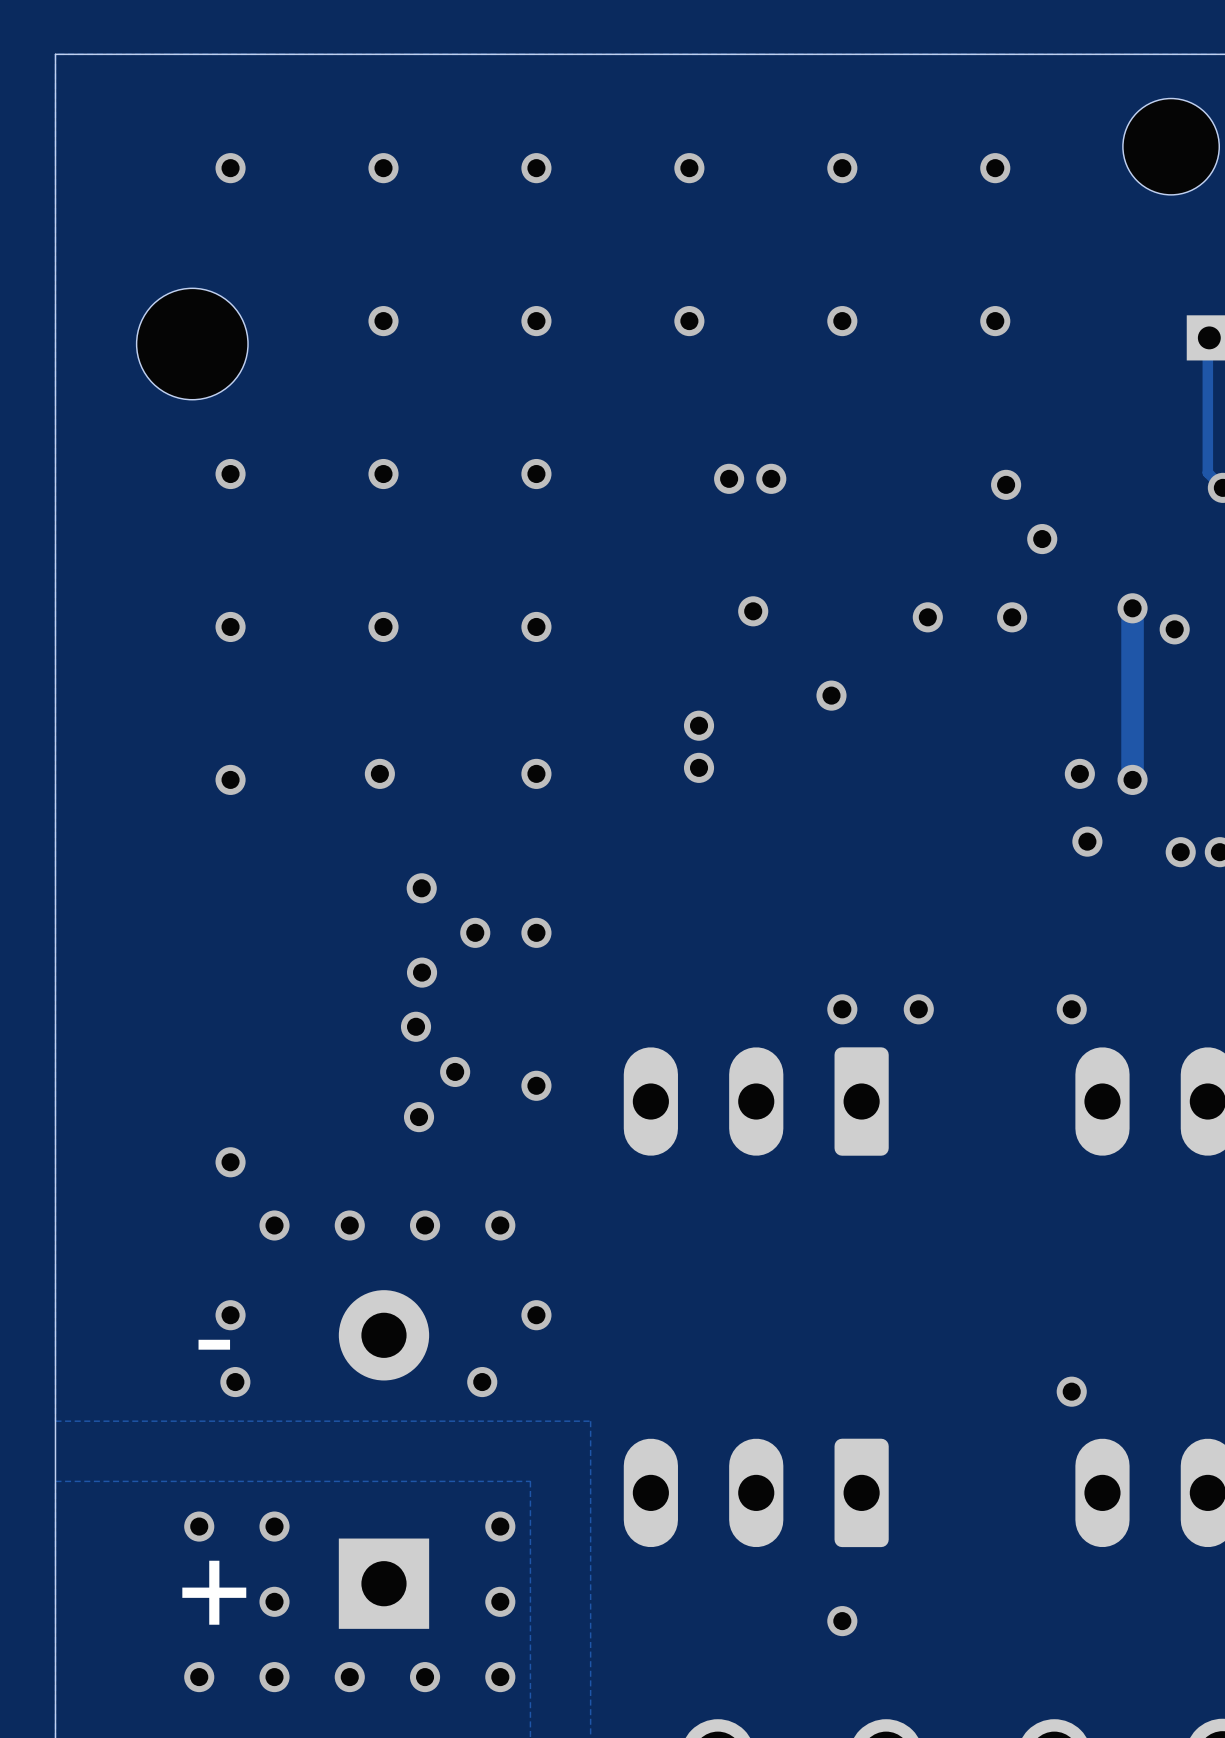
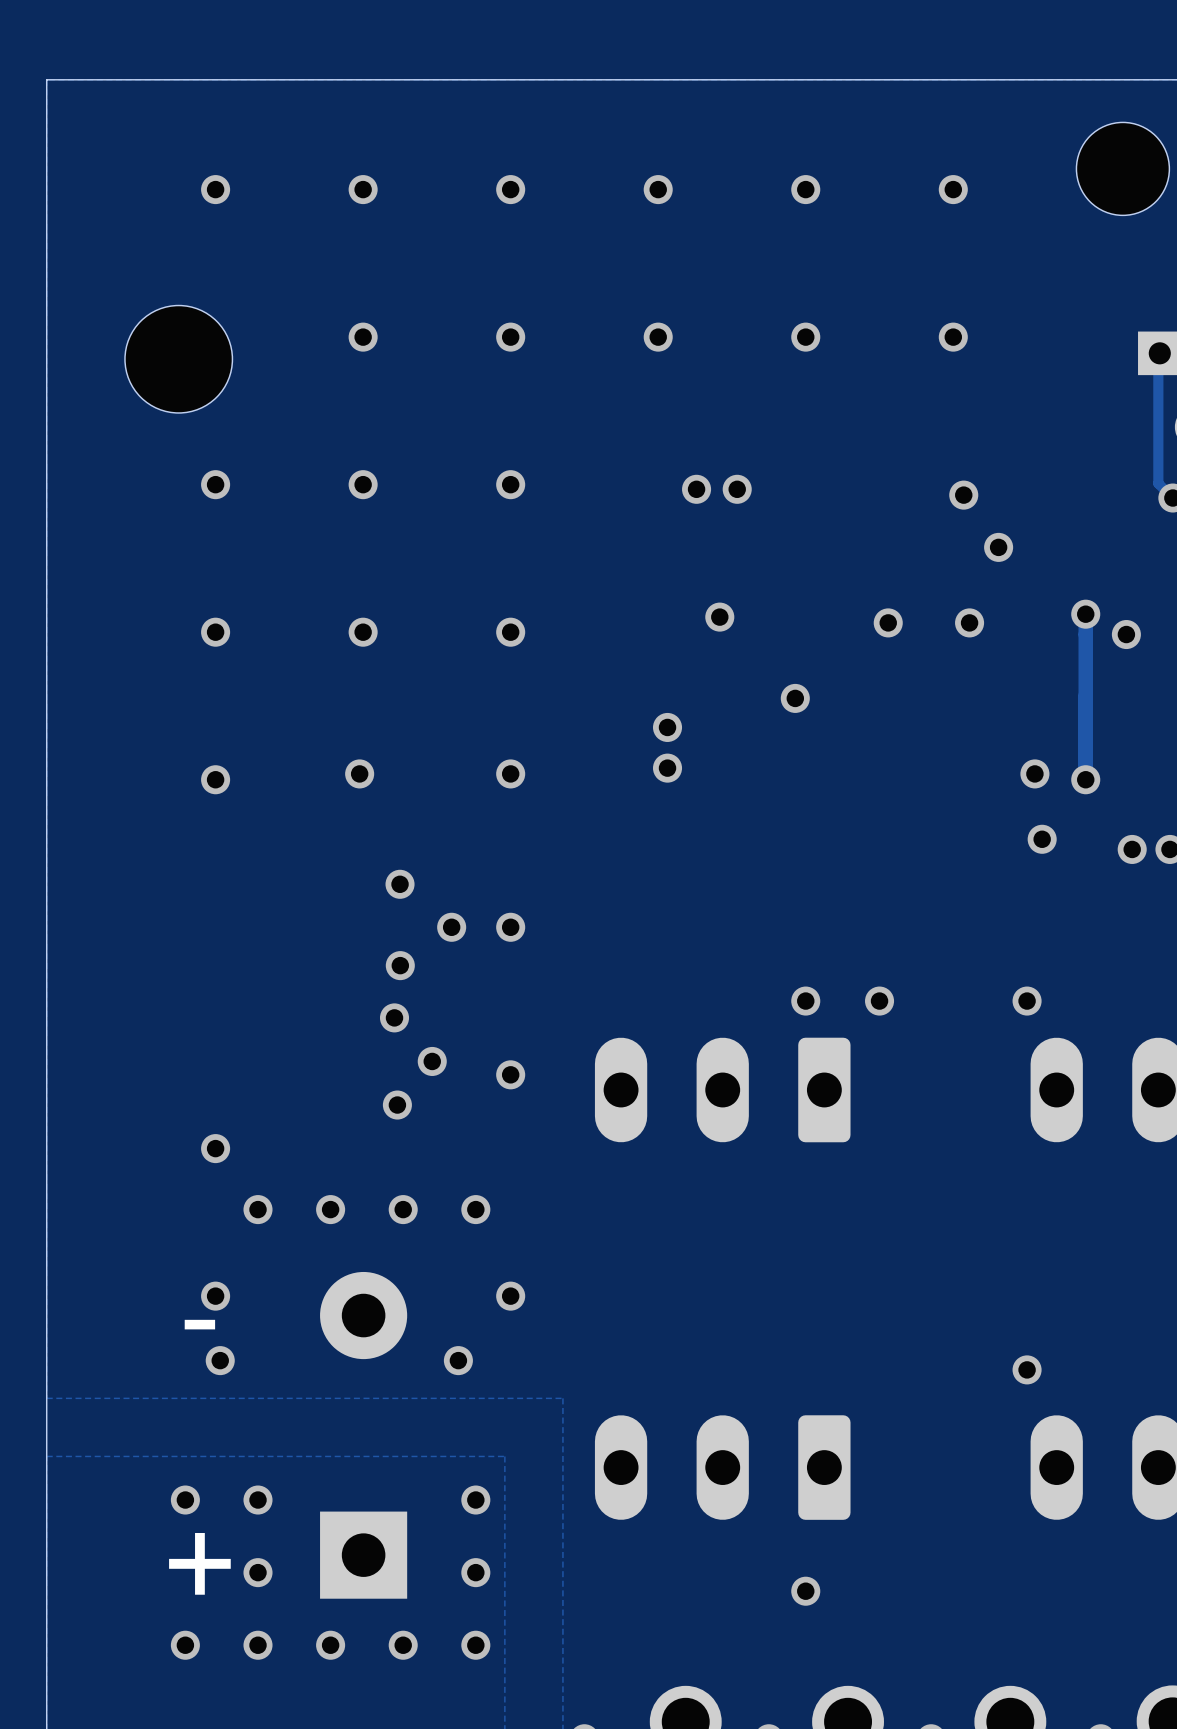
track width: thick (1132, 608) (1132, 779) -> thin (1085, 614) (1085, 779)

